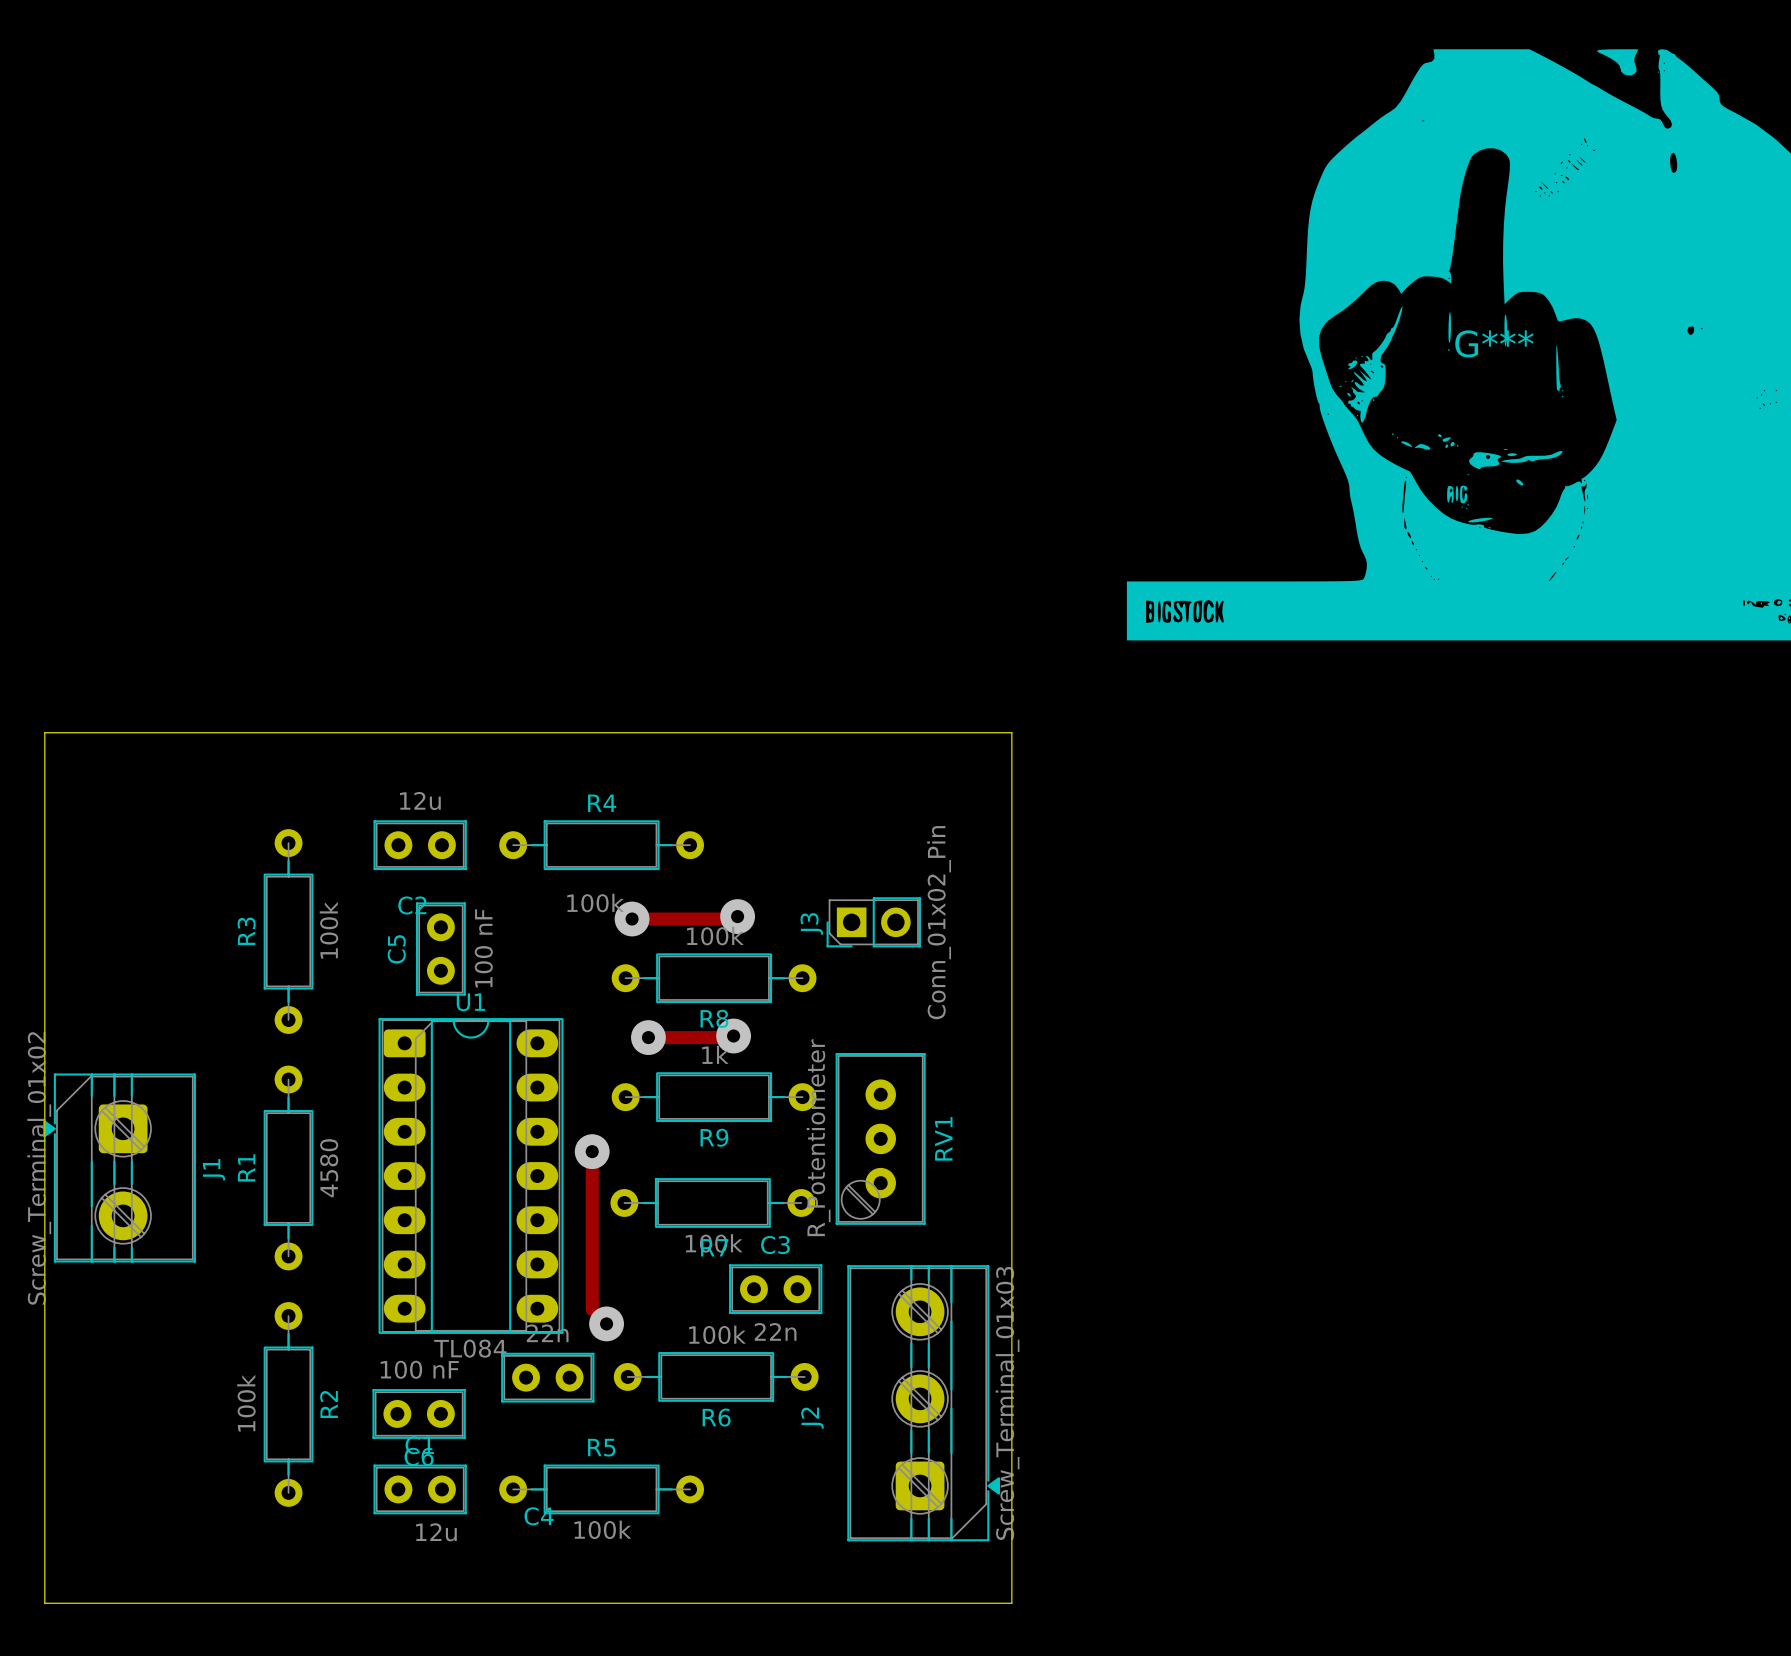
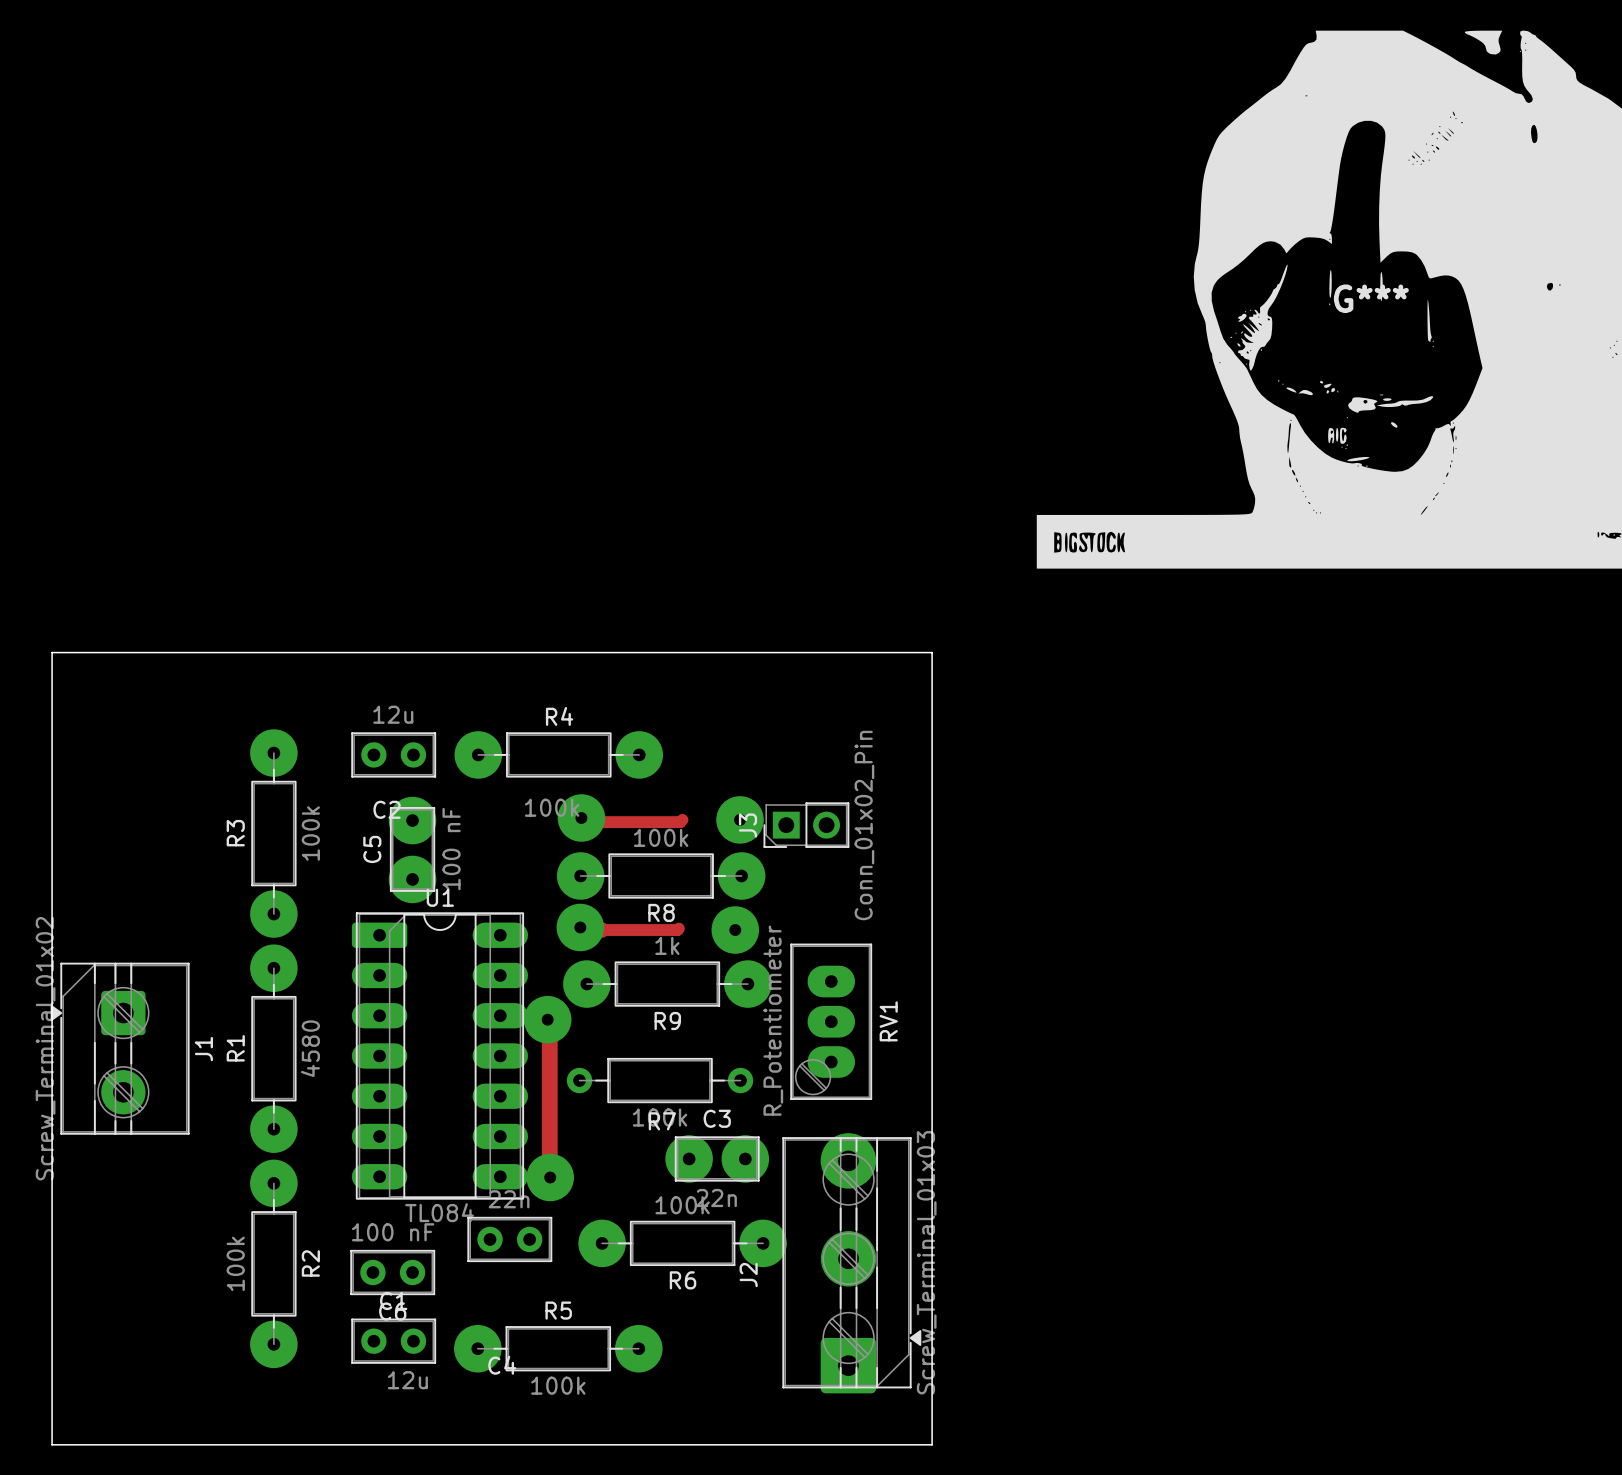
R4 footprint: [499, 820, 704, 871] -> [454, 731, 664, 779]
R3 footprint: [263, 829, 314, 1034] -> [250, 729, 298, 938]
via size: [614, 901, 650, 937] -> [557, 794, 606, 842]
C5 footprint: [416, 902, 466, 996] -> [388, 796, 437, 904]
via: (737, 916) -> none
via: none -> (740, 819)
R8 footprint: [611, 953, 817, 1004] -> [556, 852, 766, 900]
U1 footprint: [378, 1018, 564, 1334] -> [351, 912, 529, 1200]
via: none -> (580, 927)
via: (733, 1036) -> none
via: (648, 1037) -> none
via: none -> (735, 930)
RV1 footprint: [835, 1052, 926, 1225] -> [790, 943, 873, 1100]
R1 footprint: [263, 1065, 314, 1271] -> [250, 944, 298, 1153]
R9 footprint: [611, 1072, 817, 1123] -> [563, 960, 772, 1008]
via size: [574, 1134, 610, 1170] -> [523, 995, 572, 1044]
track: (592, 1151) (592, 1309) -> (547, 1019) (549, 1021) (550, 1177)
C3 footprint: [729, 1264, 823, 1315] -> [665, 1135, 770, 1183]
J2 footprint: [847, 1265, 1000, 1542] -> [782, 1133, 922, 1394]
R2 footprint: [263, 1302, 314, 1507] -> [250, 1159, 298, 1369]
via: none -> (550, 1177)
via: (606, 1323) -> none
R6 footprint: [613, 1352, 819, 1402] -> [578, 1219, 787, 1268]
R5 footprint: [499, 1464, 704, 1515] -> [454, 1324, 663, 1373]

